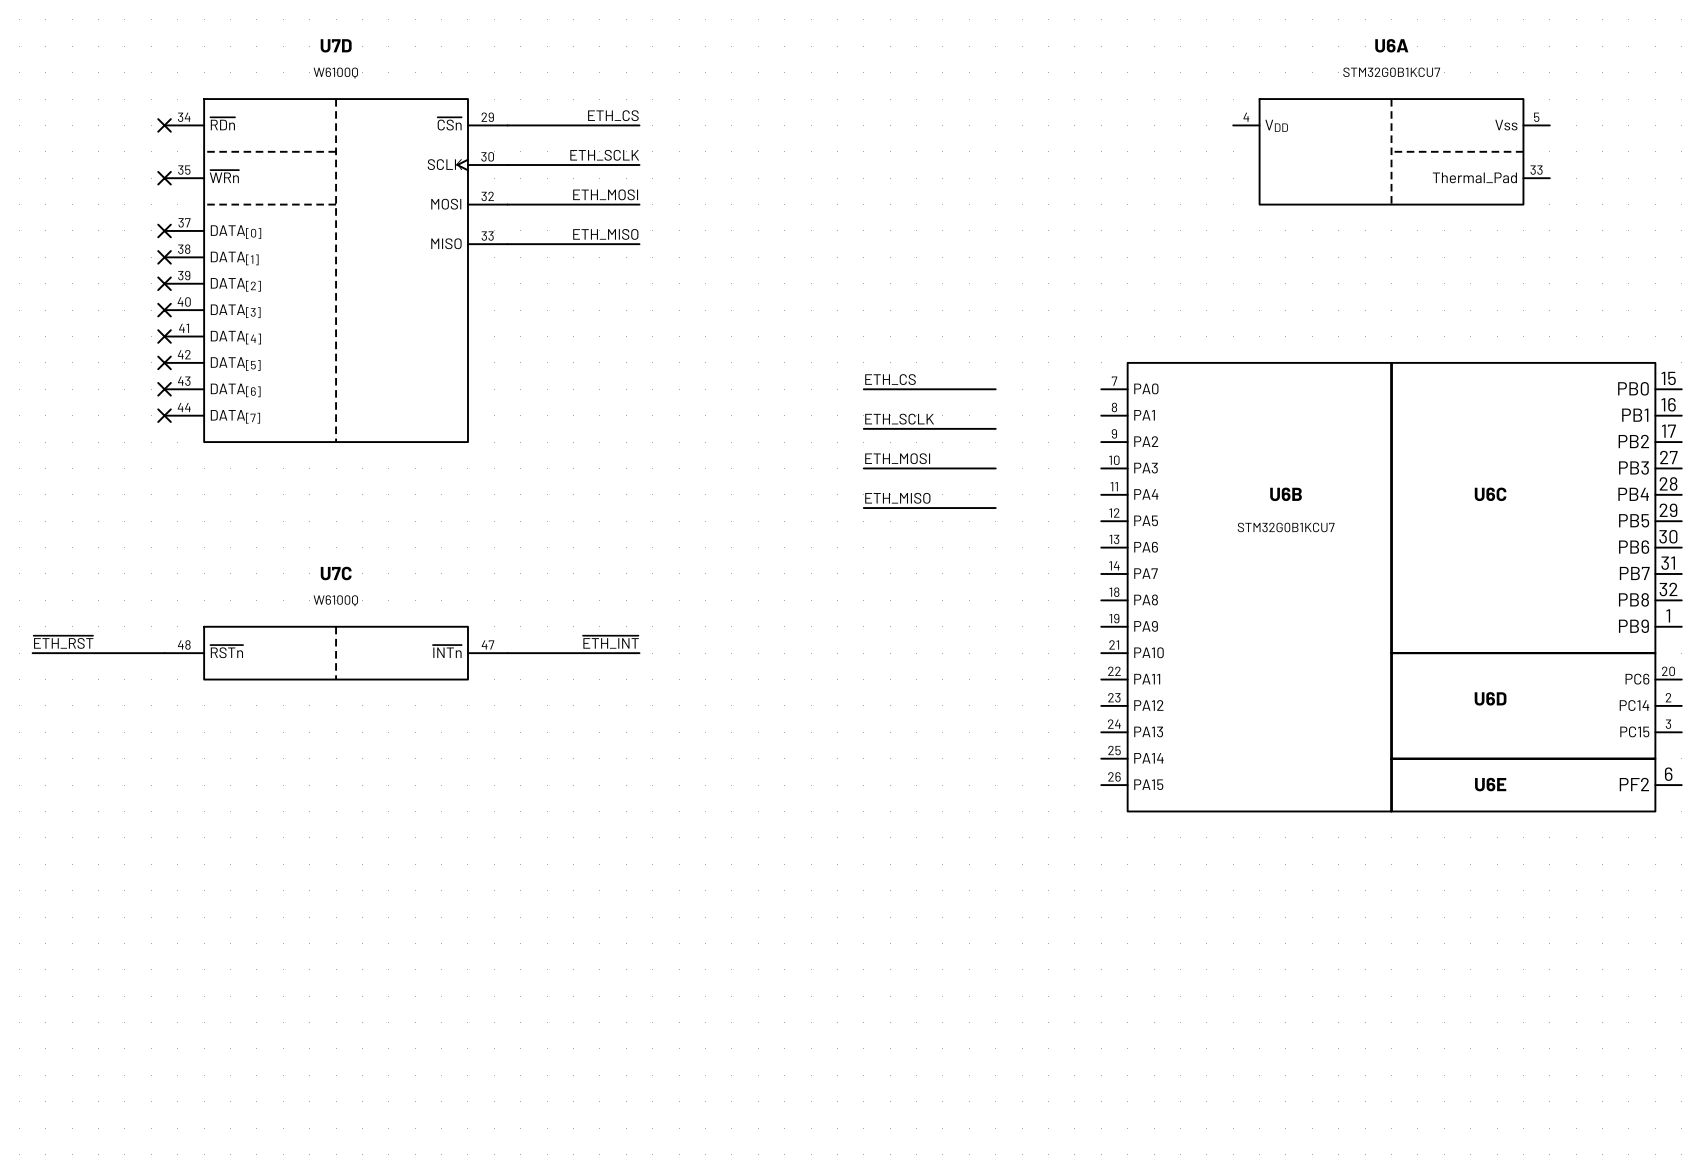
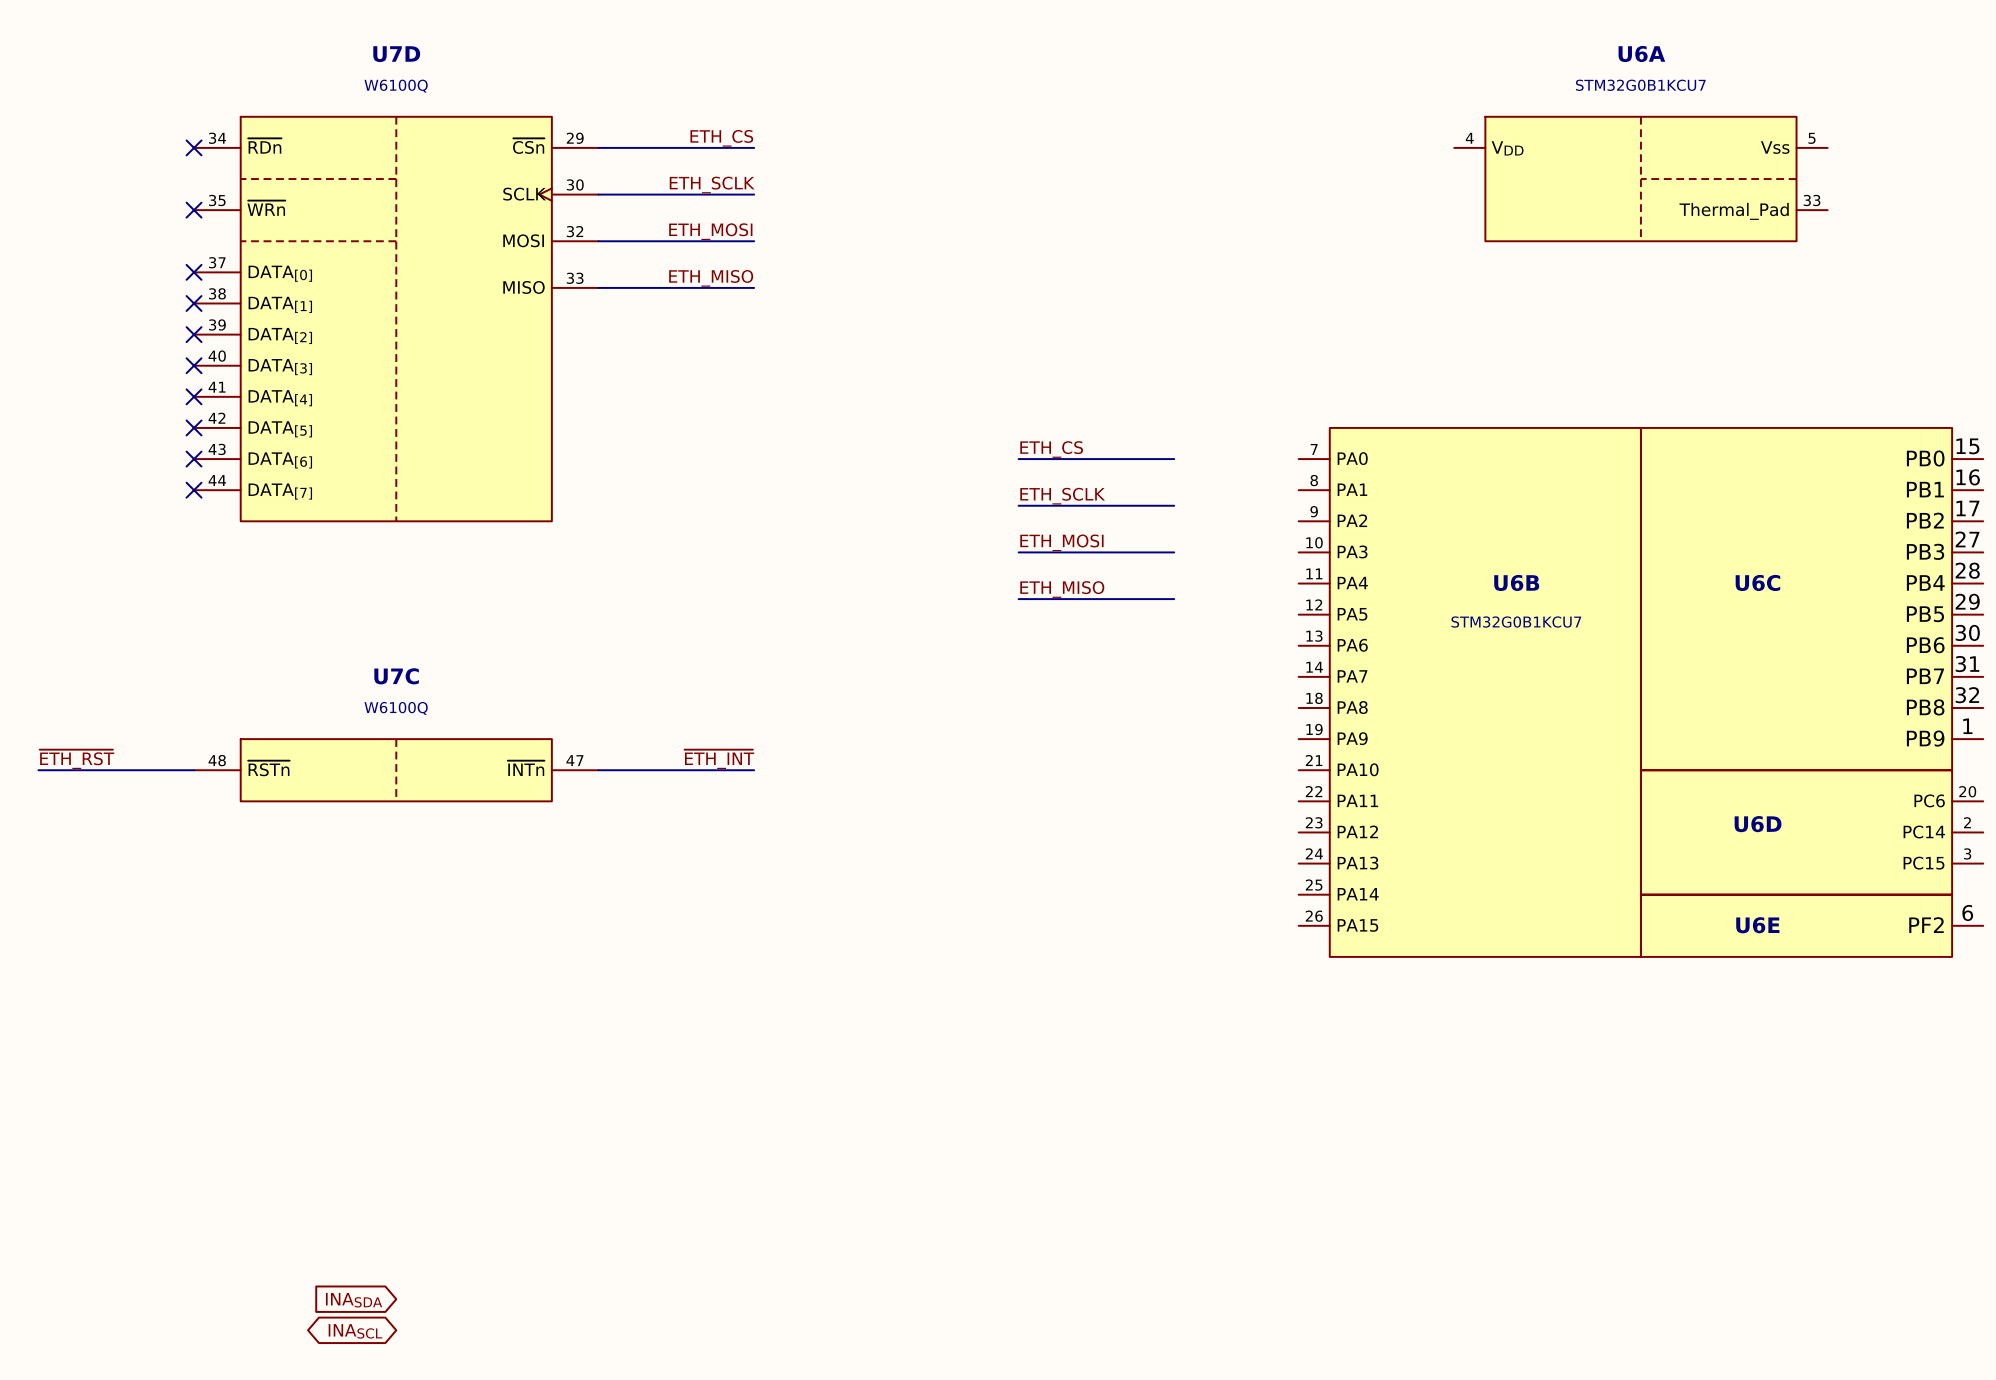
global label: none -> INASDA (354, 1300)
global label: none -> INASCL (355, 1331)

